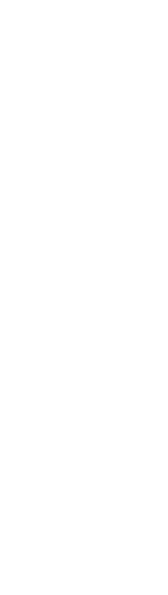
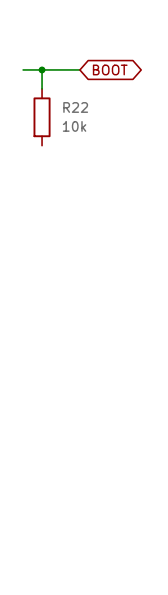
wire: none -> (23, 69) (79, 69)
wire: none -> (42, 69) (42, 88)
junction: none -> (42, 69)
global label: none -> BOOT (110, 69)
R22: none -> 10k (42, 117)

